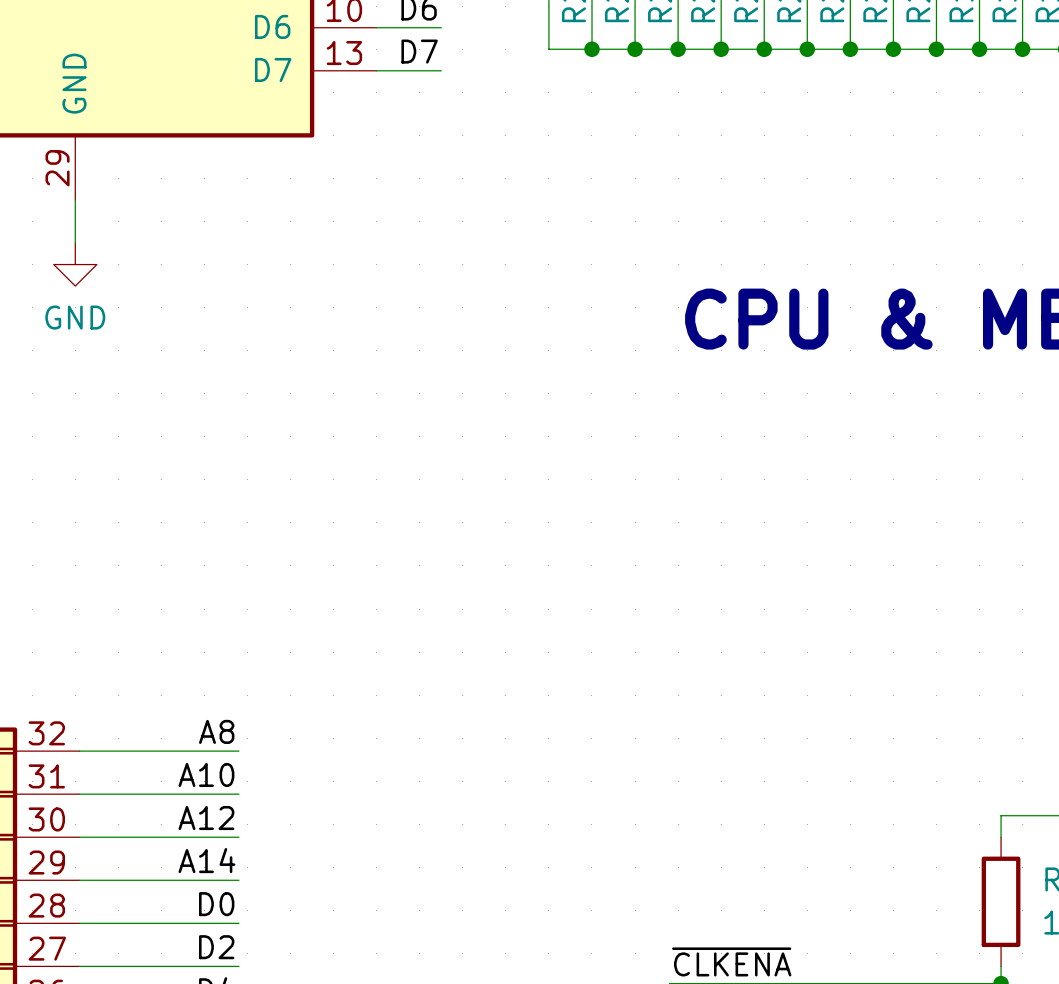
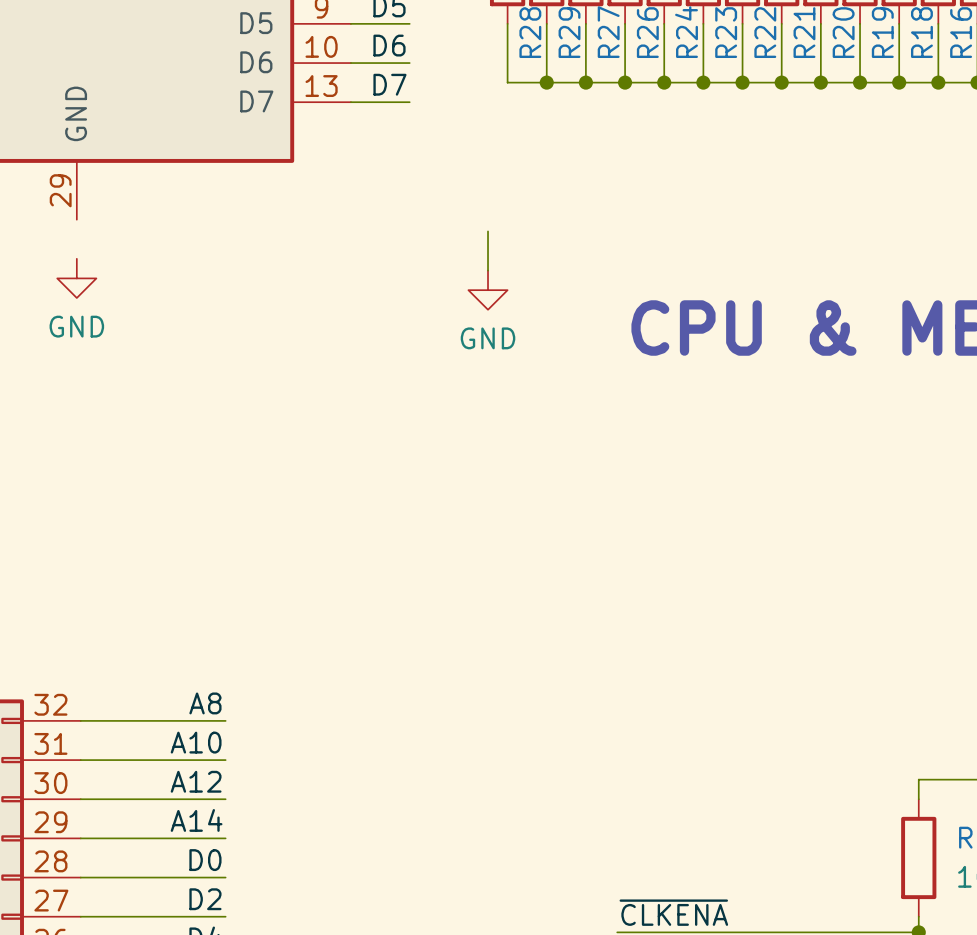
wire: (75, 199) (75, 243) -> none
wire: none -> (488, 231) (488, 270)
power symbol: none -> GND (488, 290)

